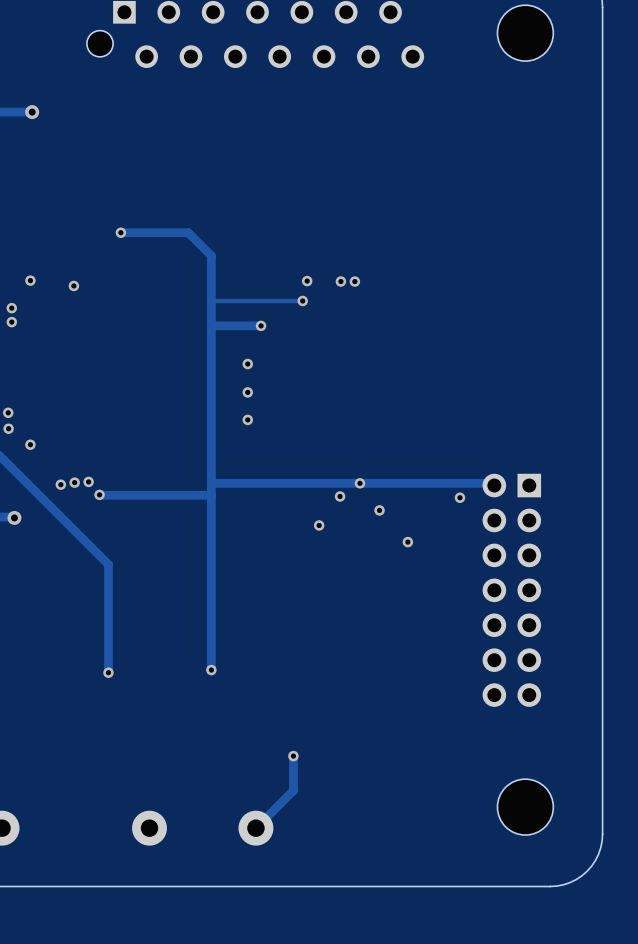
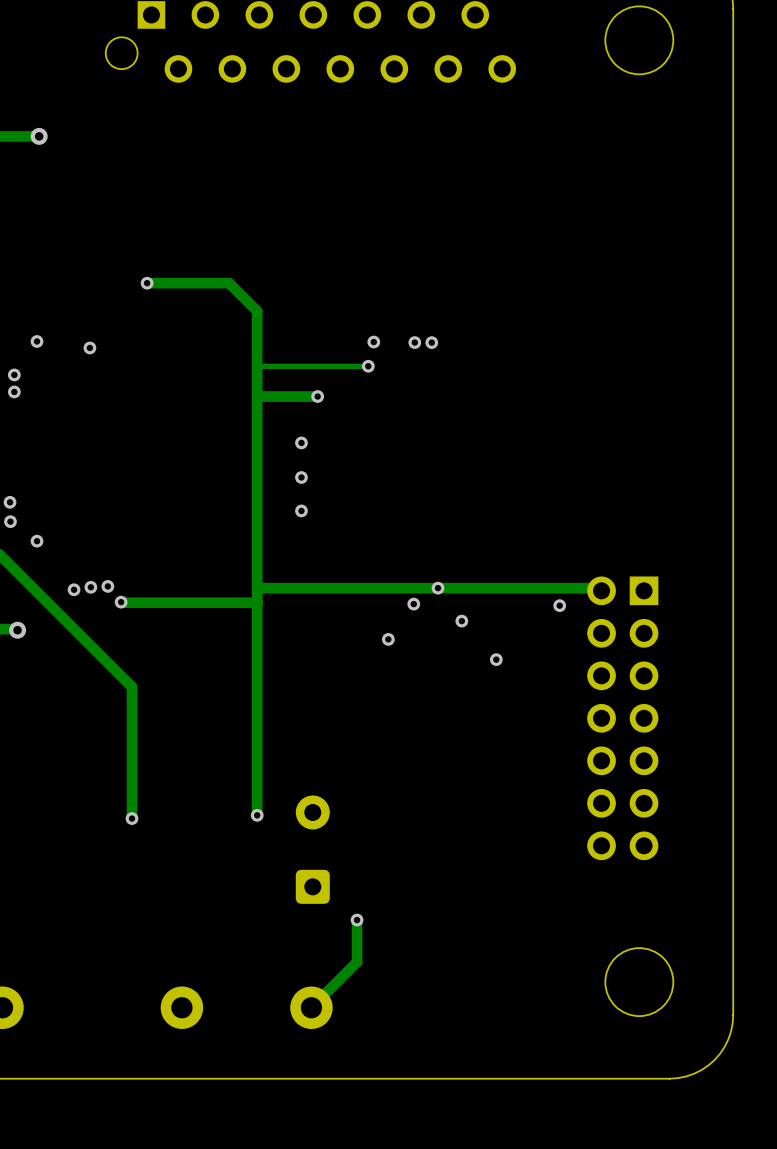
part: none -> (312, 849)

